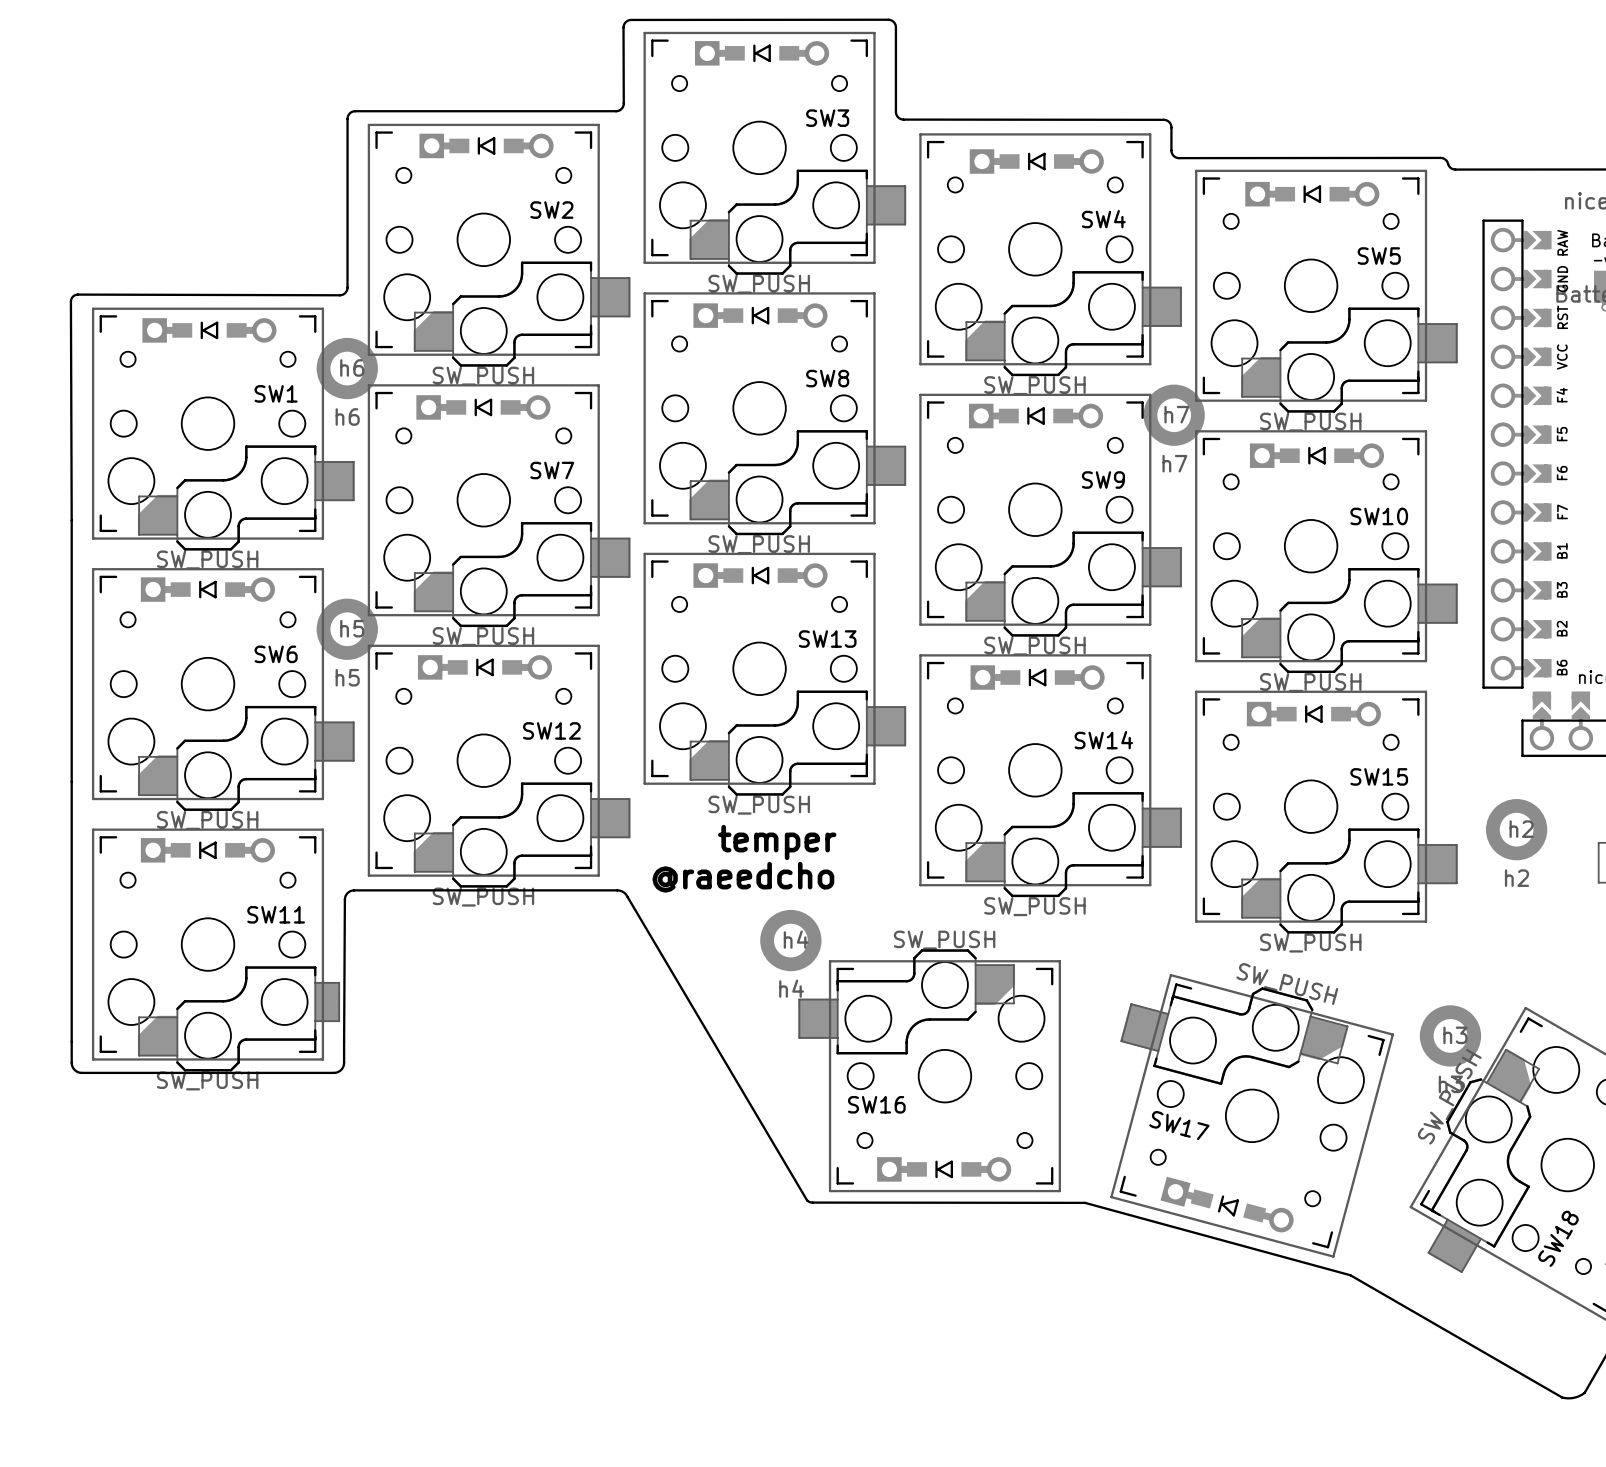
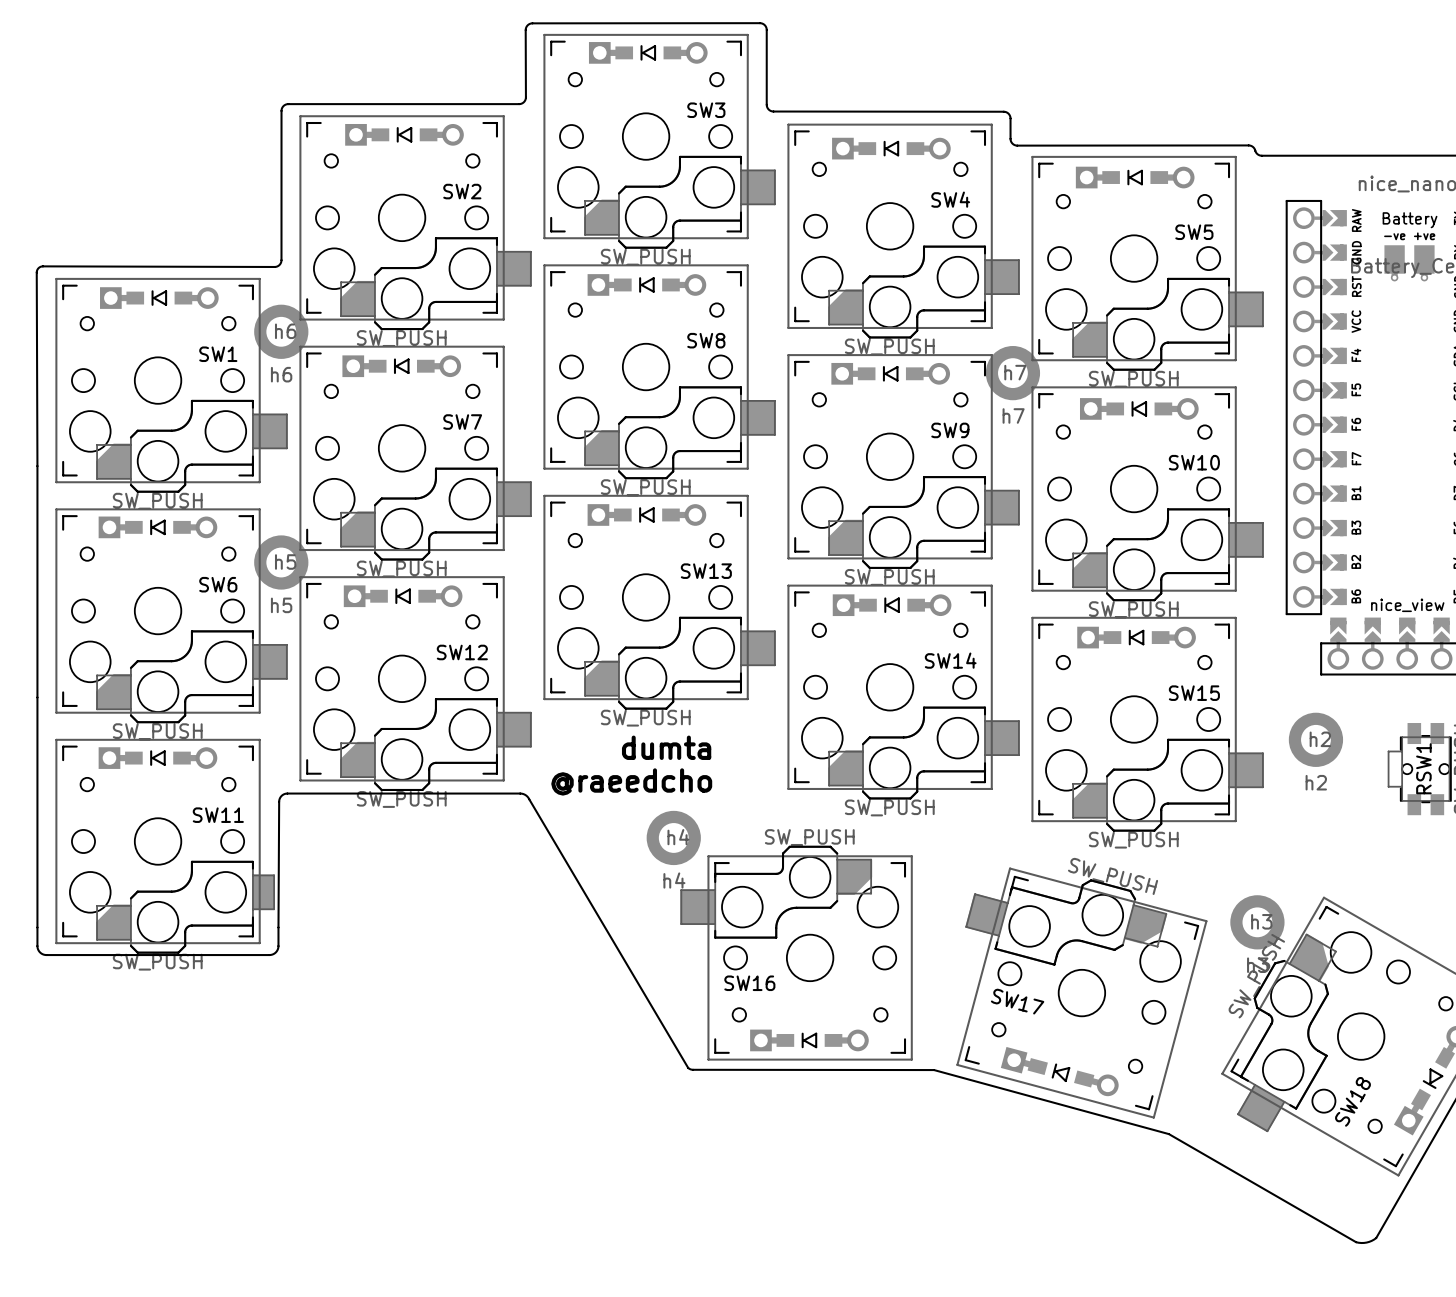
text: temper (777, 842) -> dumta (666, 747)

